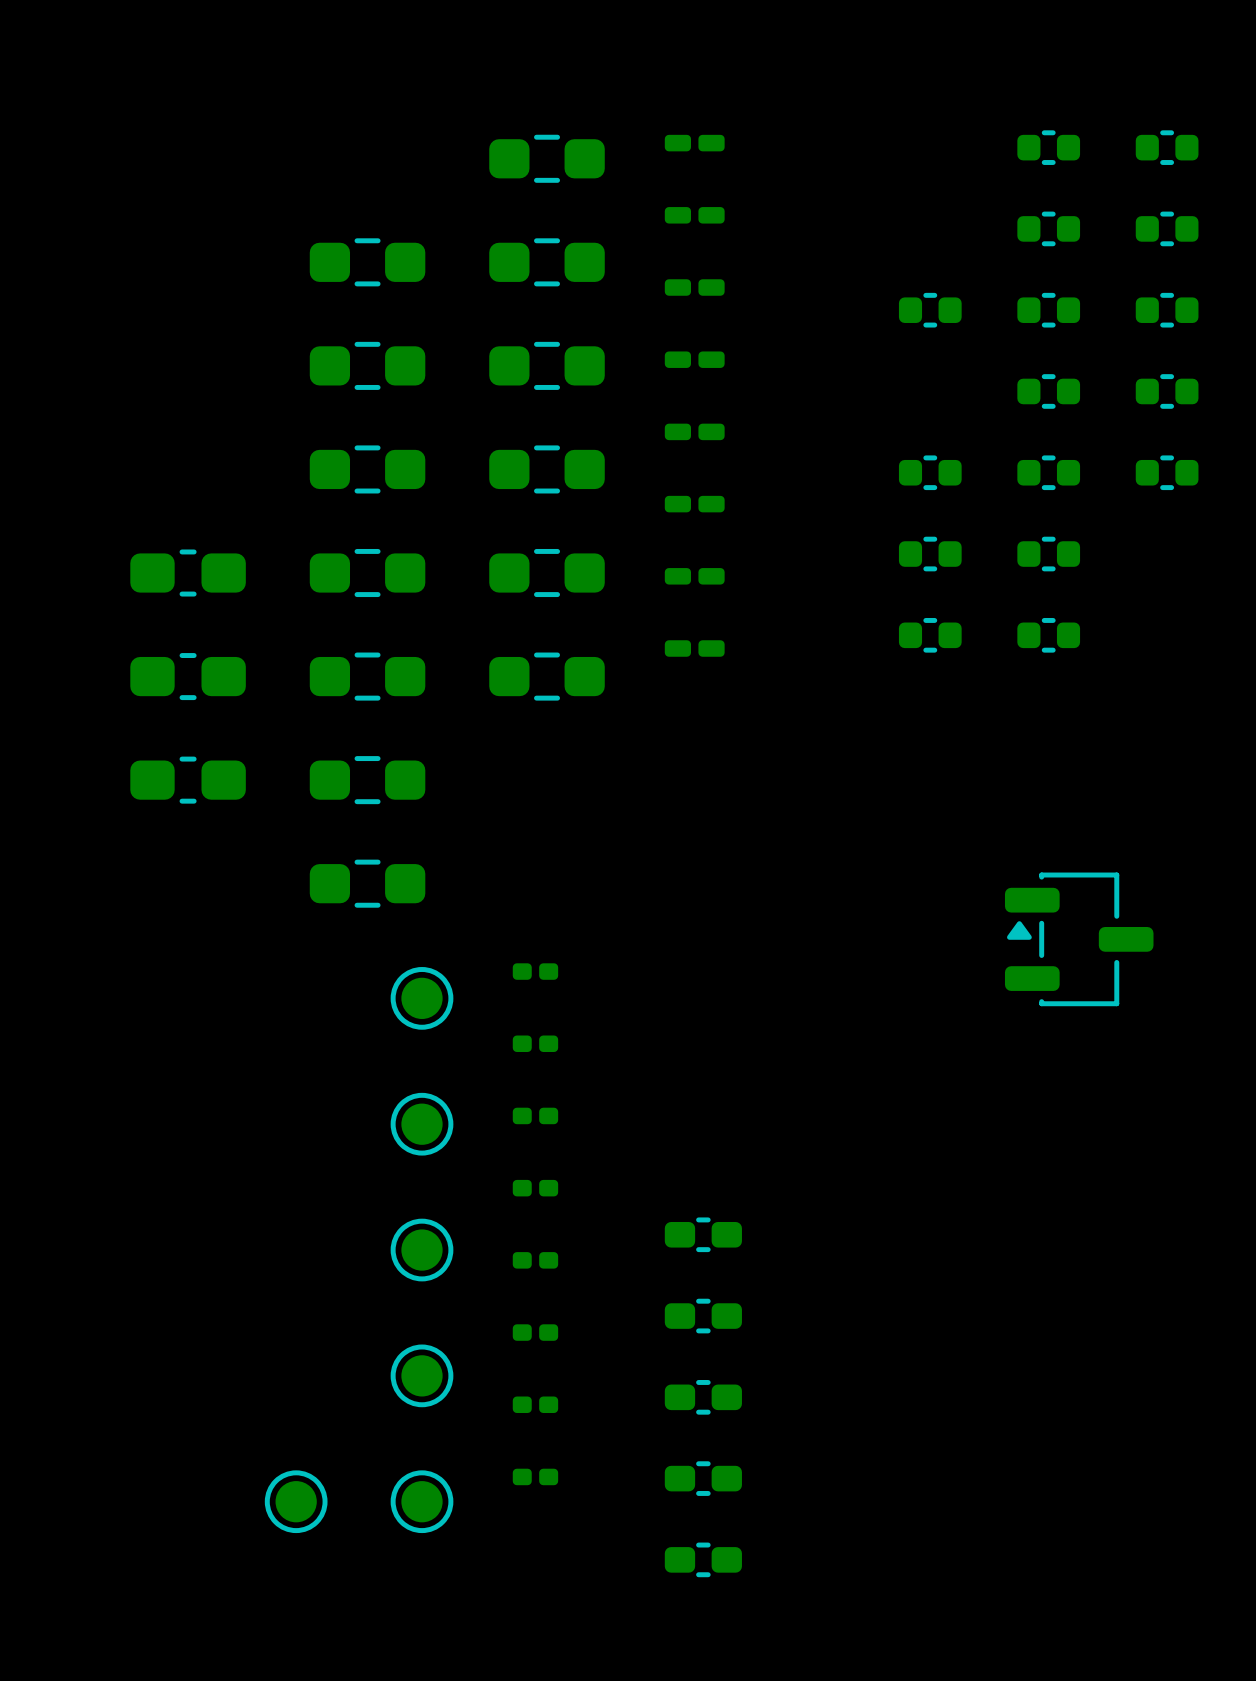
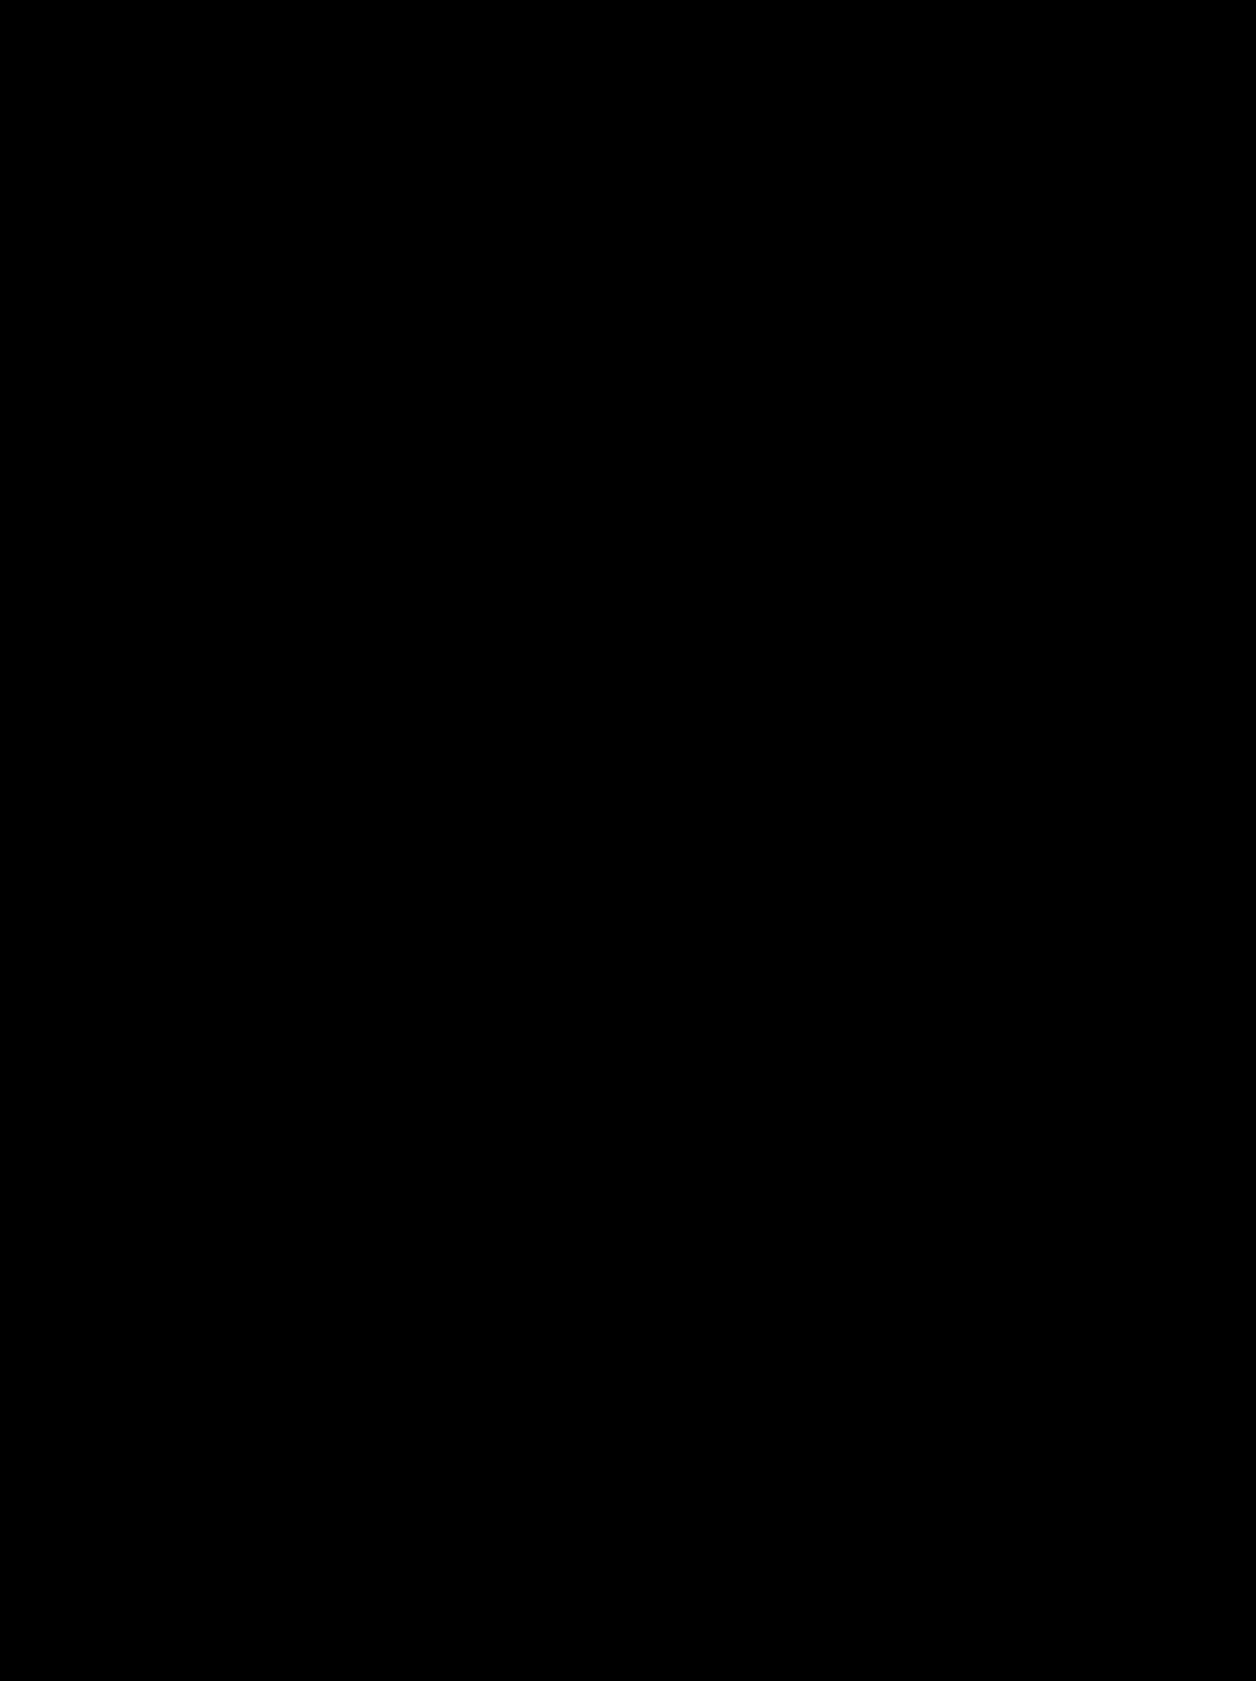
part: (694, 143) -> none
part: (1048, 147) -> none
part: (1167, 147) -> none
part: (547, 158) -> none
part: (694, 215) -> none
part: (1048, 228) -> none
part: (1167, 228) -> none
part: (367, 262) -> none
part: (547, 262) -> none
part: (694, 287) -> none
part: (930, 310) -> none
part: (1048, 310) -> none
part: (1167, 310) -> none
part: (694, 359) -> none
part: (367, 365) -> none
part: (547, 365) -> none
part: (1048, 391) -> none
part: (1167, 391) -> none
part: (694, 431) -> none
part: (367, 469) -> none
part: (547, 469) -> none
part: (930, 472) -> none
part: (1048, 472) -> none
part: (1167, 472) -> none
part: (694, 504) -> none
part: (930, 554) -> none
part: (1048, 554) -> none
part: (188, 573) -> none
part: (367, 573) -> none
part: (547, 573) -> none
part: (694, 576) -> none
part: (930, 635) -> none
part: (1048, 635) -> none
part: (694, 648) -> none
part: (188, 676) -> none
part: (367, 676) -> none
part: (547, 676) -> none
part: (188, 780) -> none
part: (367, 780) -> none
part: (367, 883) -> none
part: (1079, 939) -> none
part: (535, 971) -> none
part: (422, 998) -> none
part: (535, 1043) -> none
part: (535, 1115) -> none
part: (422, 1124) -> none
part: (535, 1188) -> none
part: (703, 1234) -> none
part: (422, 1250) -> none
part: (535, 1260) -> none
part: (703, 1316) -> none
part: (535, 1332) -> none
part: (422, 1375) -> none
part: (703, 1397) -> none
part: (535, 1404) -> none
part: (535, 1476) -> none
part: (703, 1478) -> none
part: (296, 1501) -> none
part: (422, 1501) -> none
part: (703, 1559) -> none

